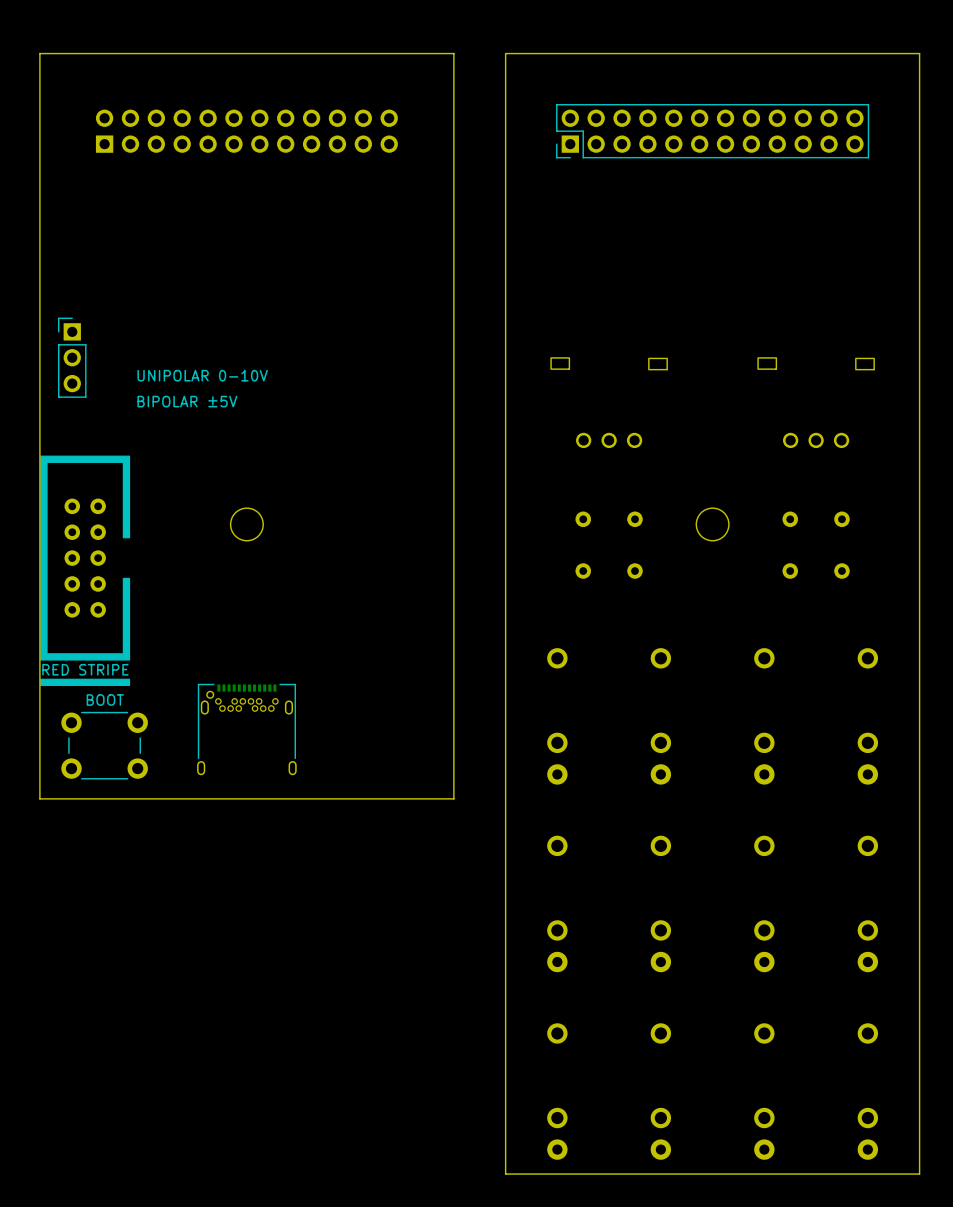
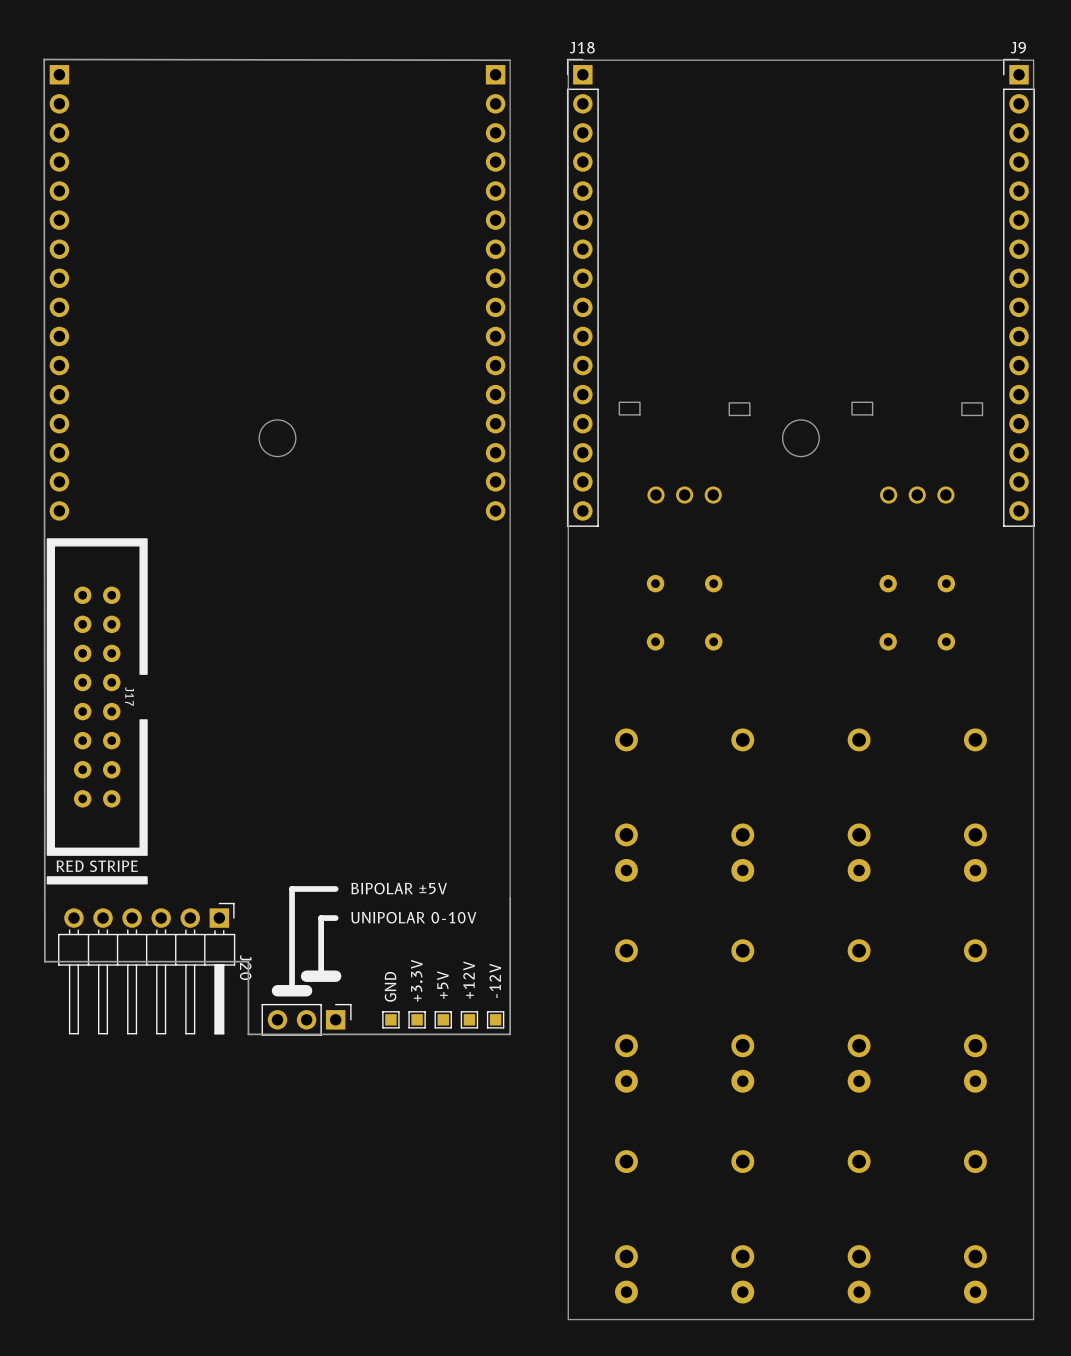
board edge: (453, 53) (39, 53) (39, 798) (453, 798) -> (510, 60) (44, 59) (44, 961) (248, 961) (248, 1034) (510, 1034) (510, 897)
part: (246, 131) -> none
part: (712, 131) -> none
part: none -> (59, 292)
part: none -> (495, 292)
J18: none -> (582, 292)
J9: none -> (1019, 292)
part: (72, 357) -> none
text: UNIPOLAR 0-10V (202, 375) -> none
text: BIPOLAR ±5V (187, 401) -> none
round board edge position: (246, 524) -> (277, 438)
round board edge position: (712, 524) -> (800, 438)
part: (85, 570) -> none
J17: none -> (97, 711)
part: (246, 729) -> none
part: BOOT (104, 745) -> none
line: none -> (335, 888) (292, 888) (292, 990)
text: none -> BIPOLAR ±5V (399, 888)
line: none -> (335, 918) (321, 918) (321, 976)
text: none -> UNIPOLAR 0-10V (413, 917)
J20: none -> (146, 968)
text: none -> +3.3V (416, 980)
text: none -> +12V (469, 980)
text: none -> -12V (495, 980)
line: none -> (335, 976) (306, 976)
text: none -> +5V (442, 985)
text: none -> GND (390, 986)
line: none -> (306, 990) (277, 990)
part: none -> (306, 1019)
part: none -> (390, 1019)
part: none -> (417, 1019)
part: none -> (443, 1019)
part: none -> (469, 1019)
part: none -> (495, 1019)

